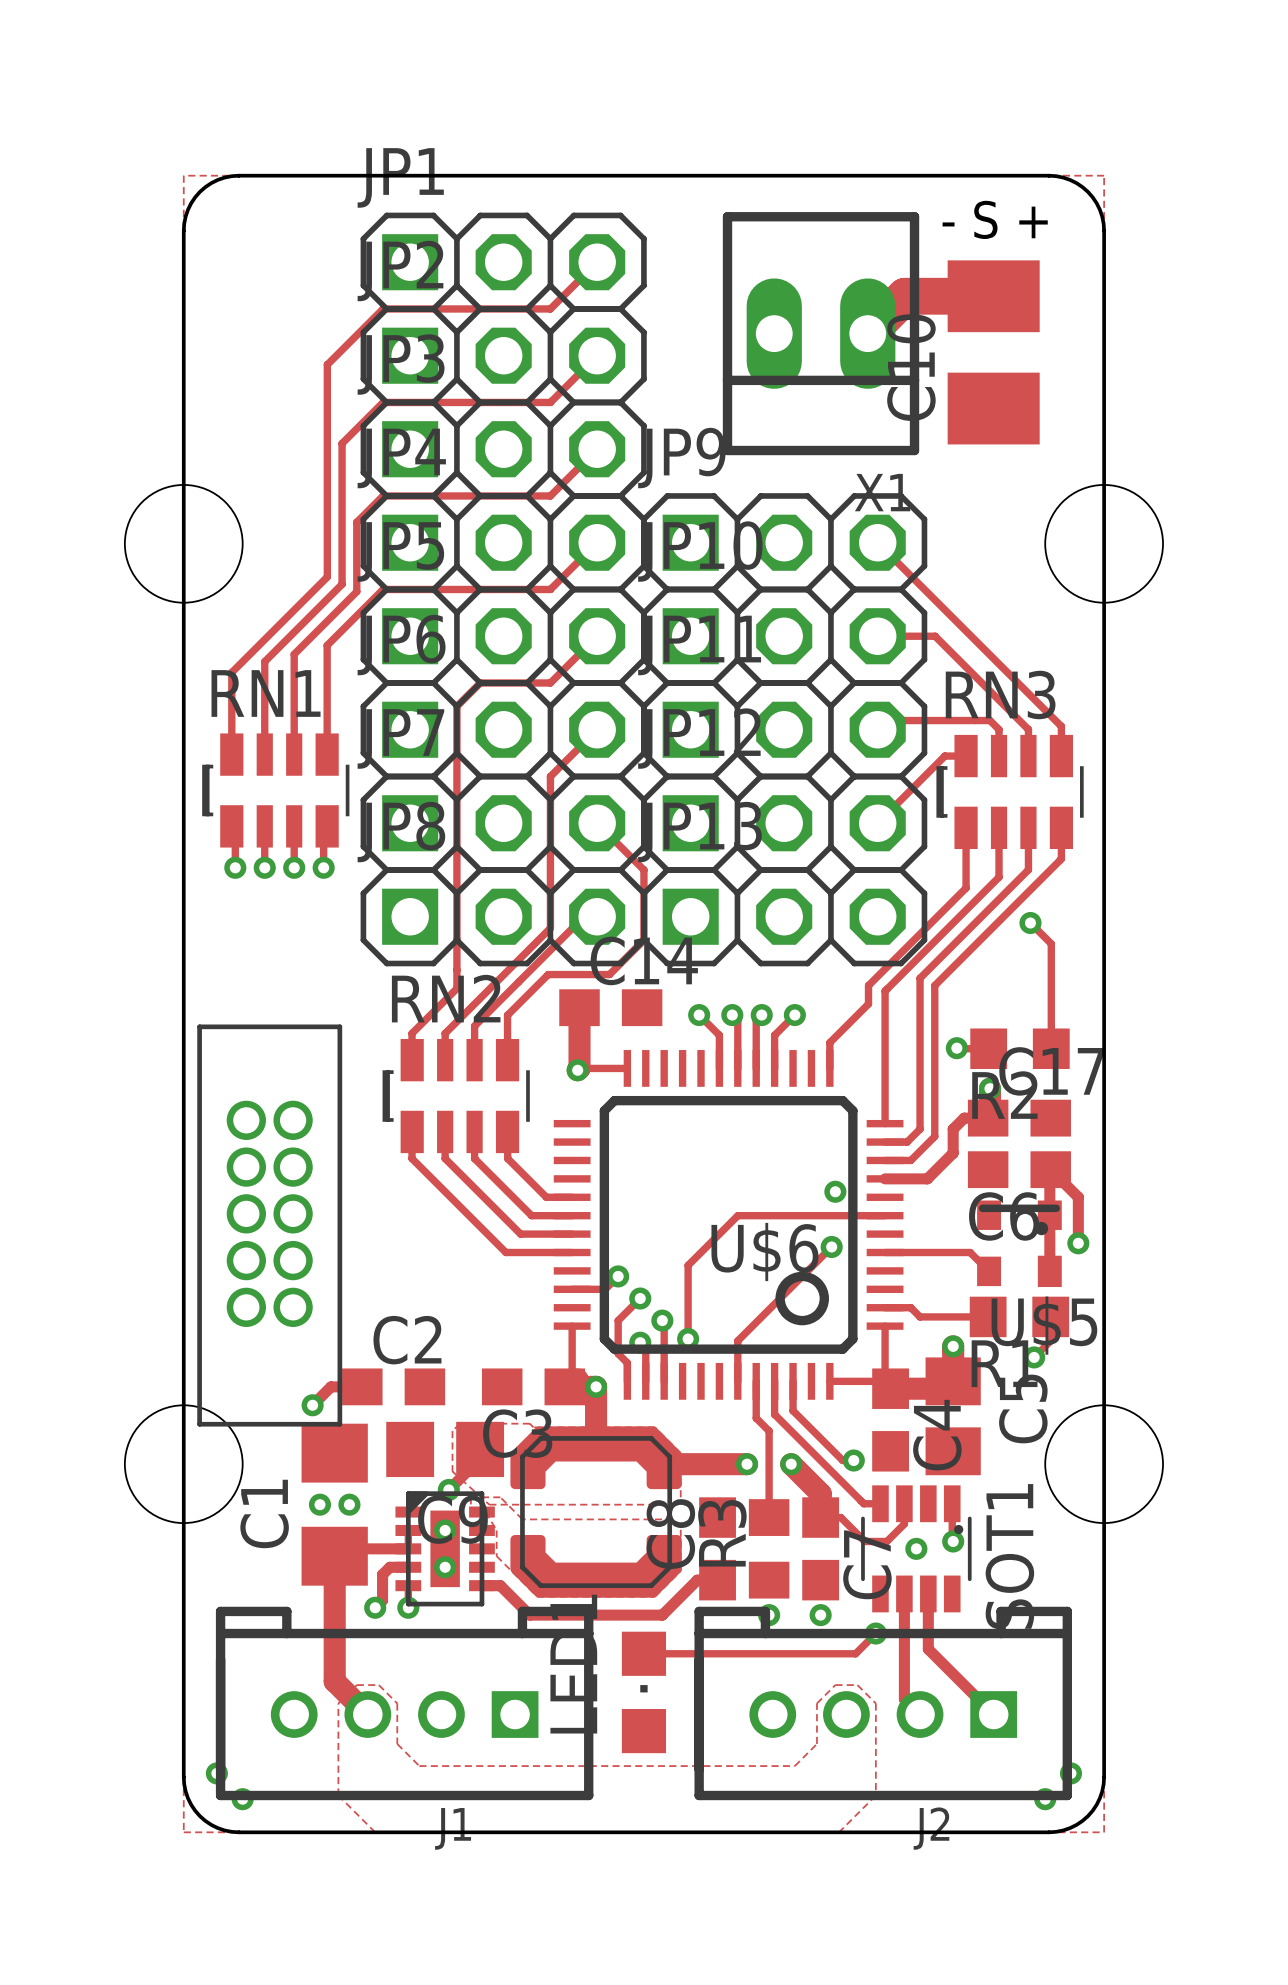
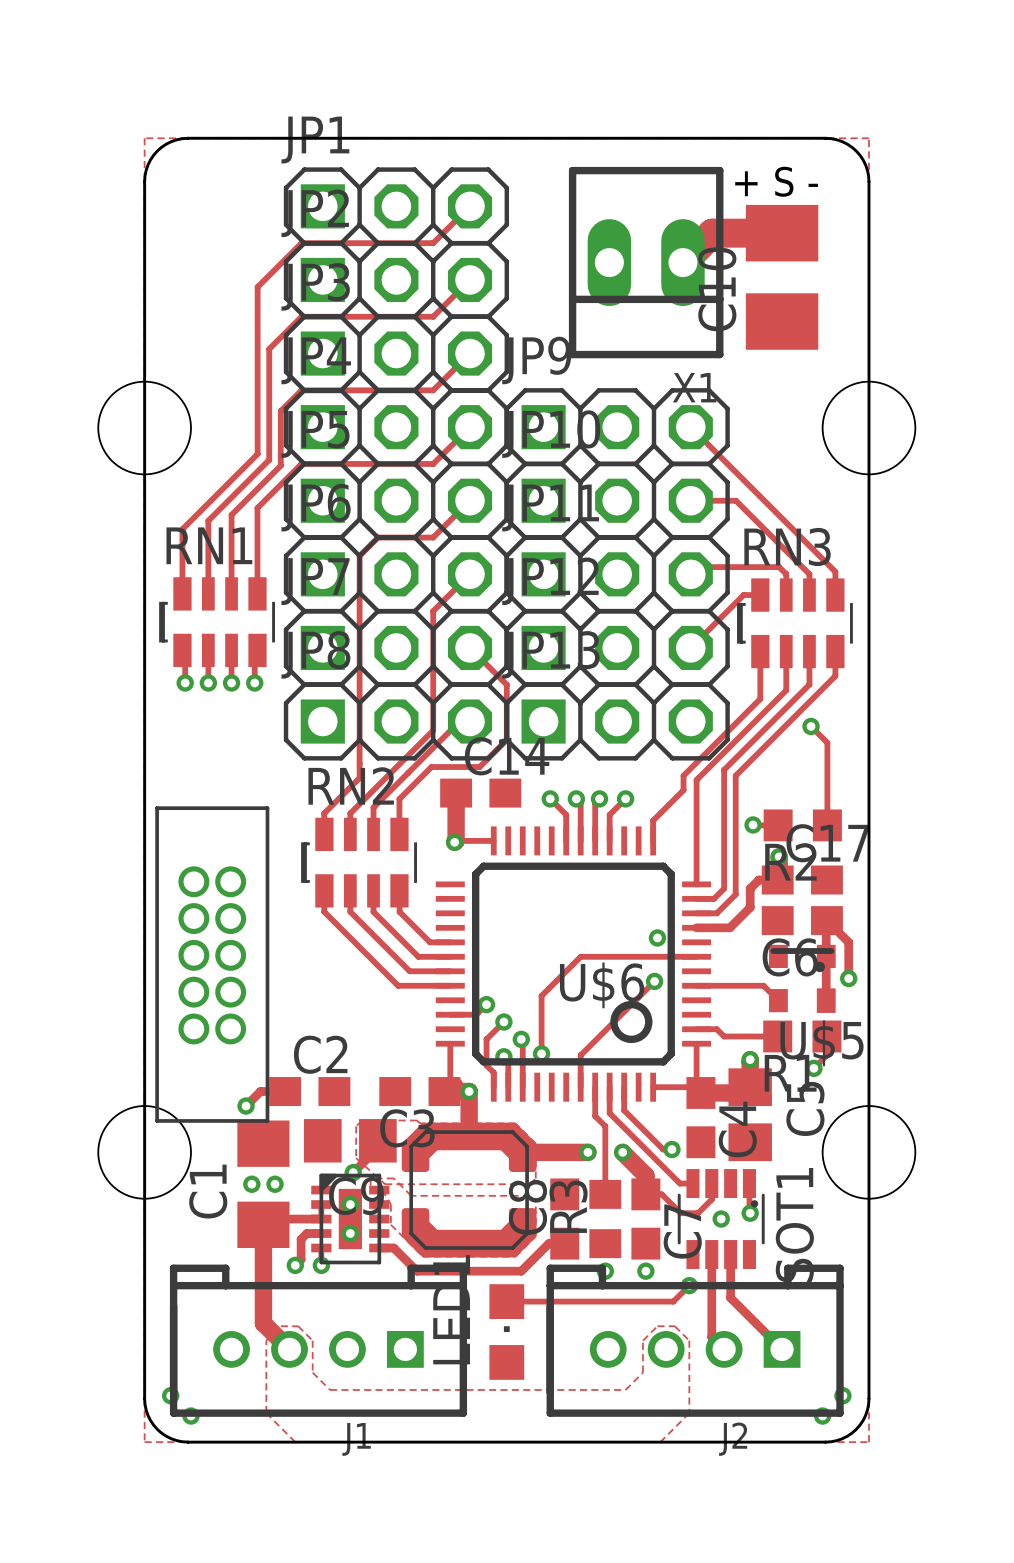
text: - S + (995, 219) -> + S - (776, 181)

